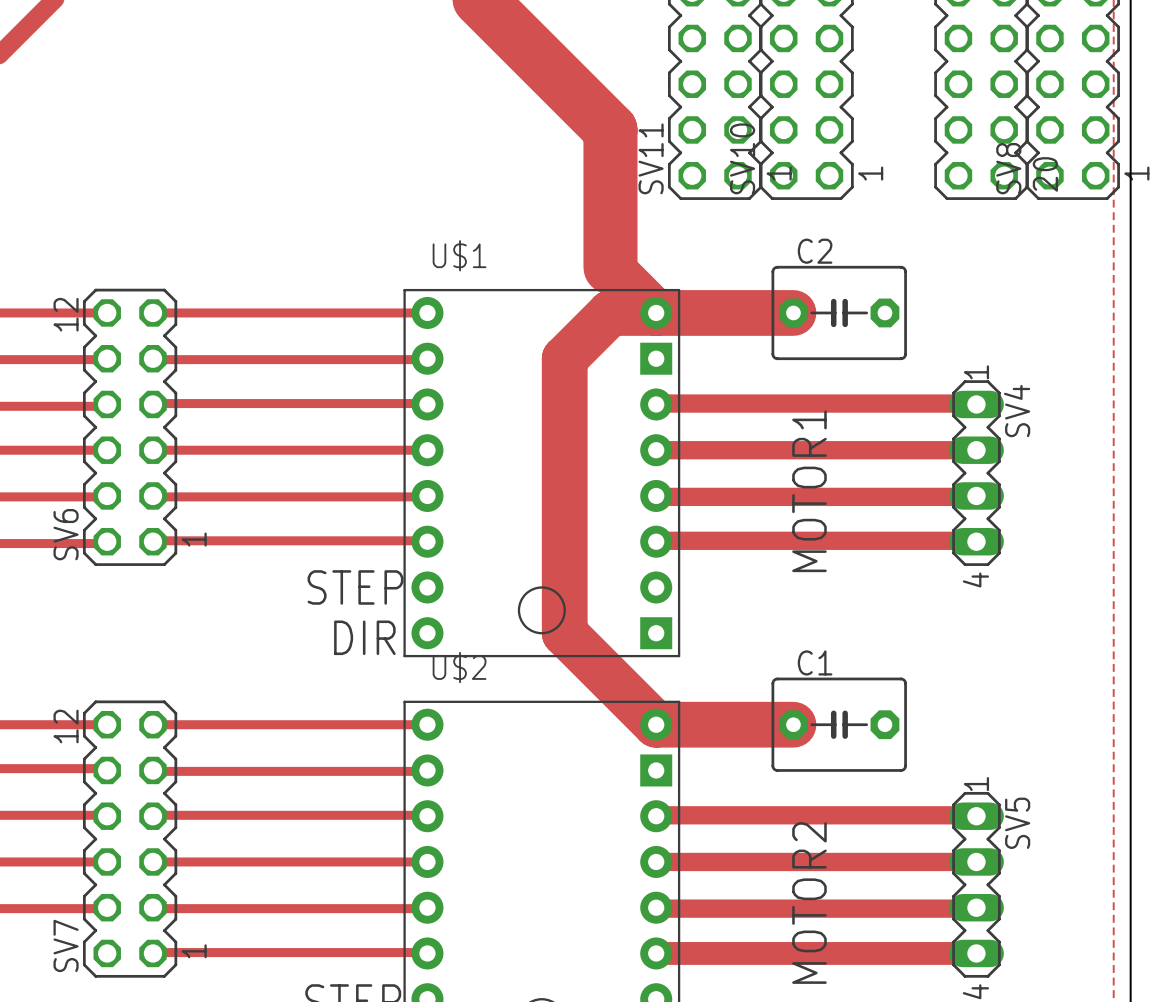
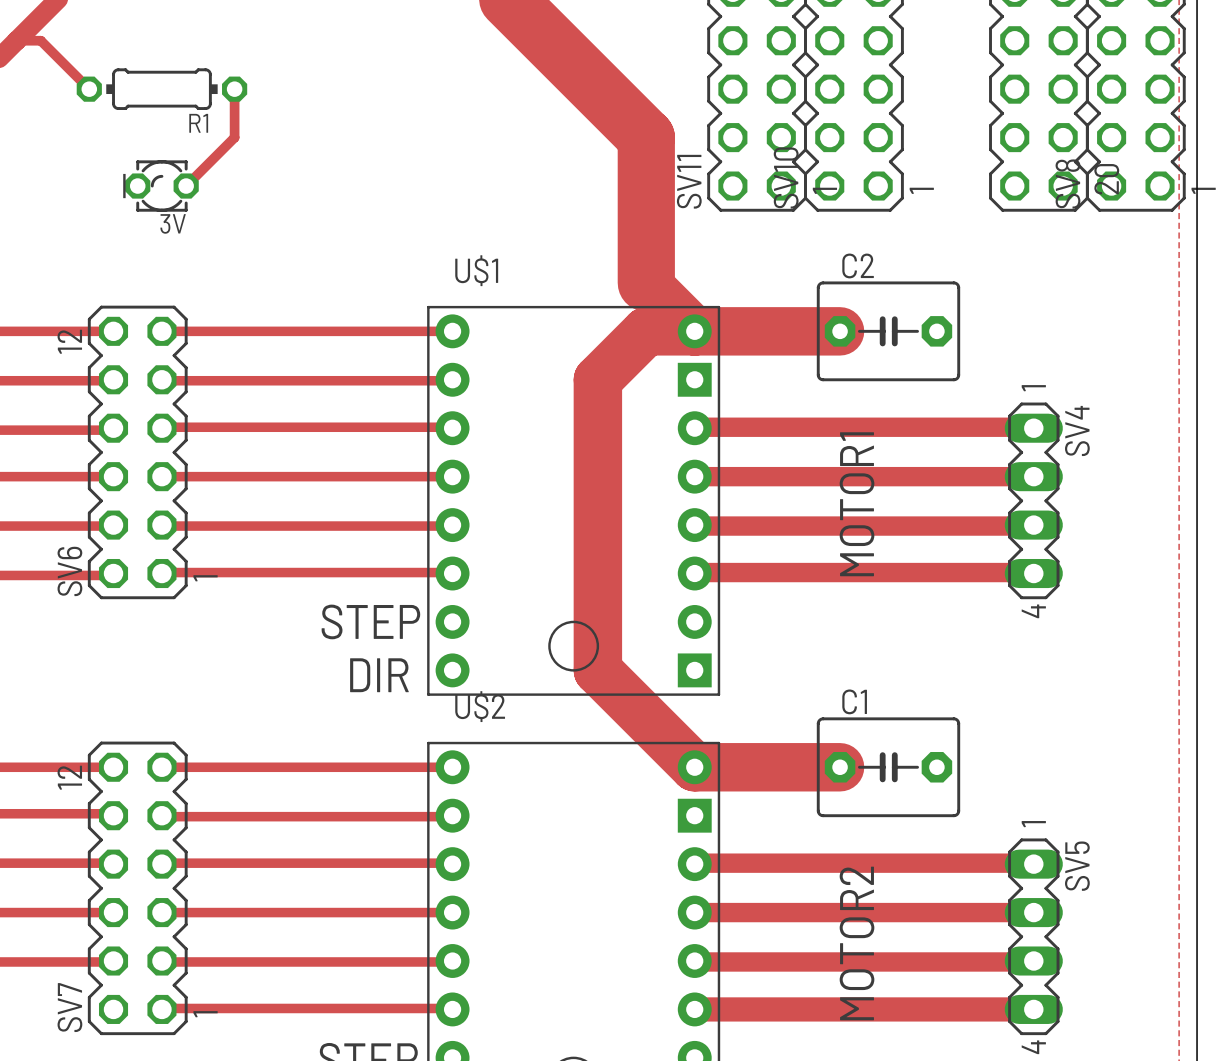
track: none -> (16, 40) (40, 40) (89, 89)
R1: none -> (161, 89)
track: none -> (234, 89) (234, 137) (186, 186)
3V: none -> (160, 186)

